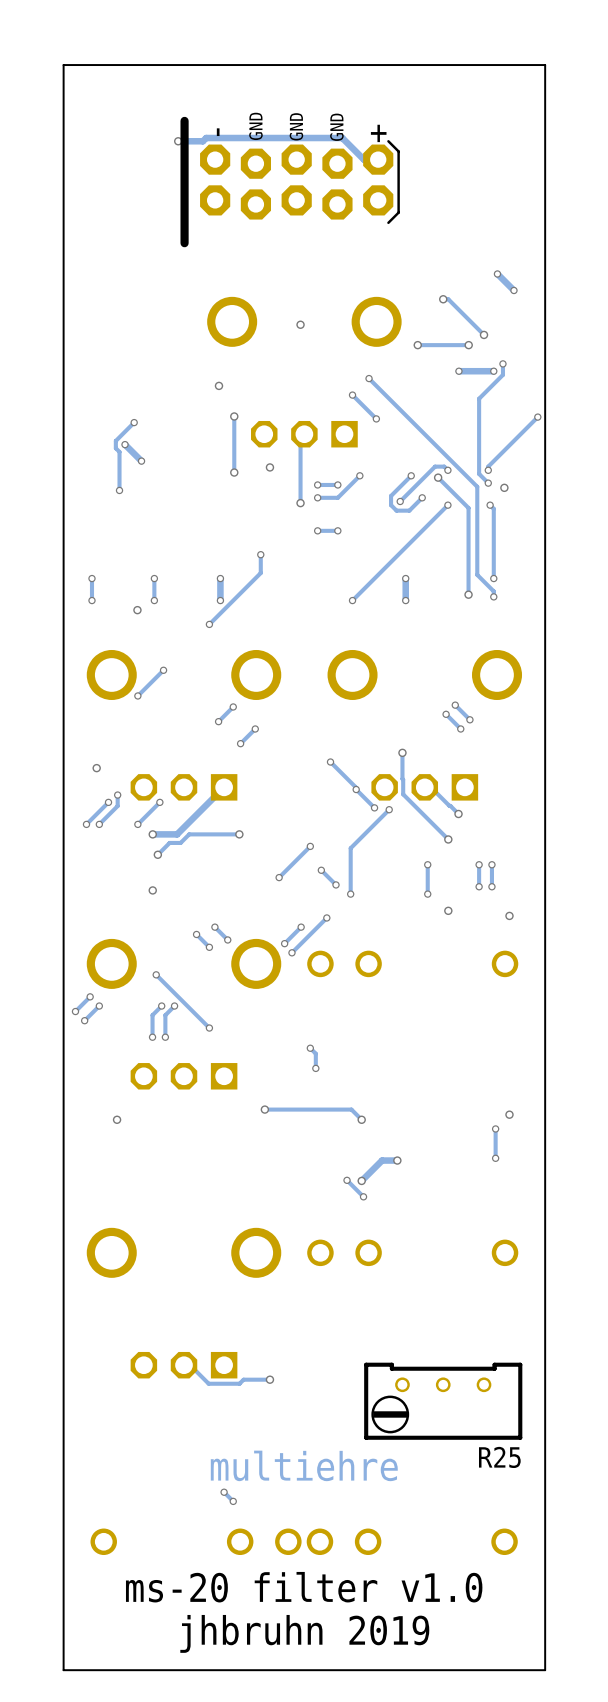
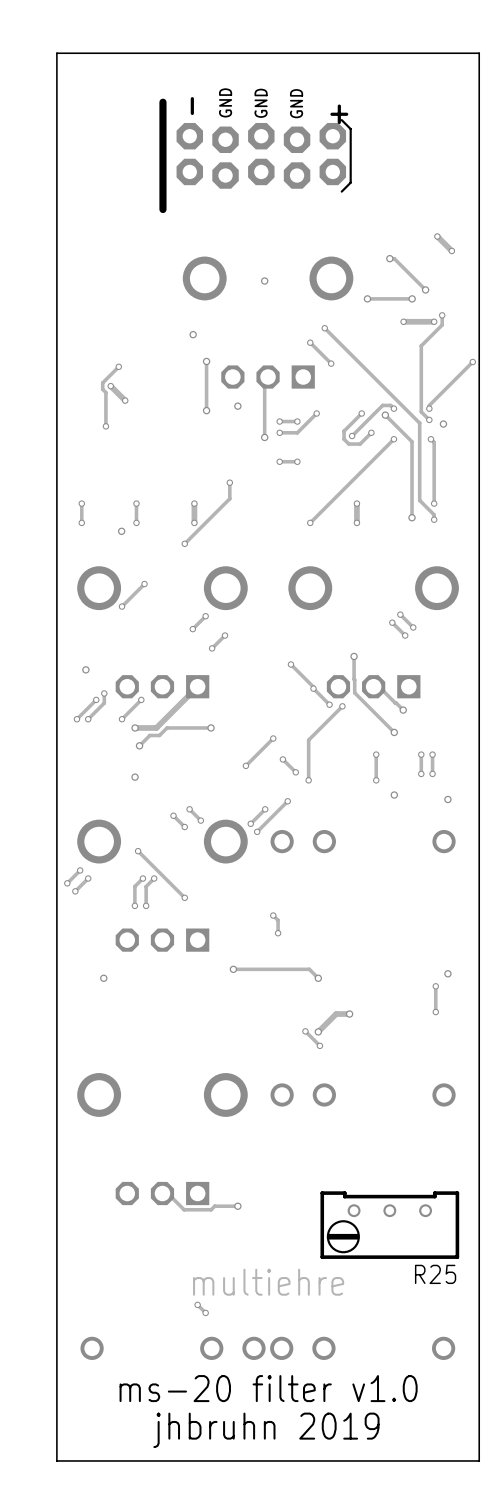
track: (178, 141) (202, 141) (206, 138) (342, 138) (363, 159) (378, 159) -> none
via: (178, 141) -> none

